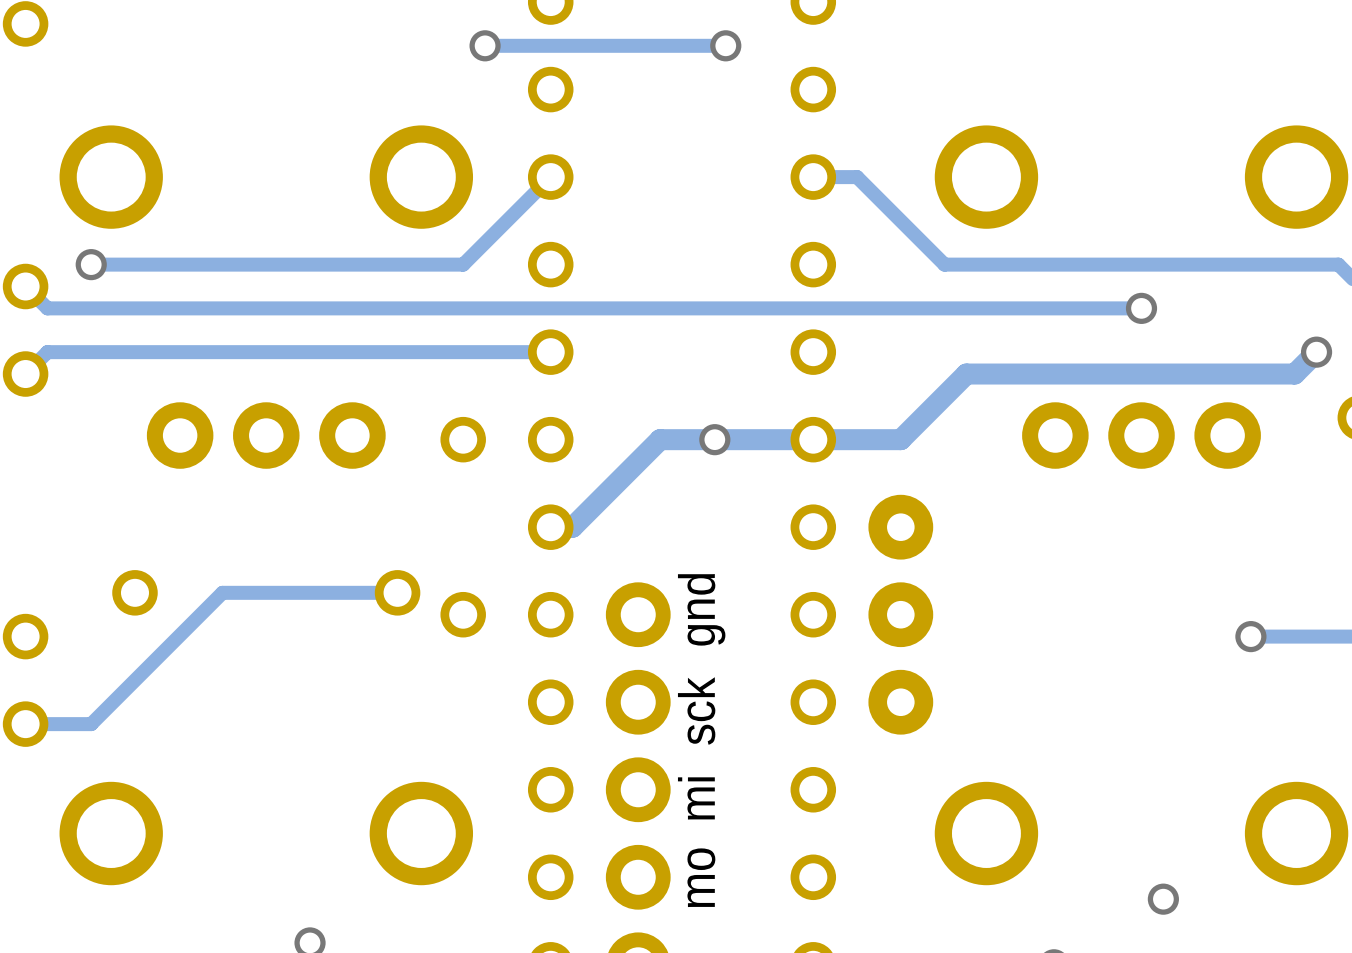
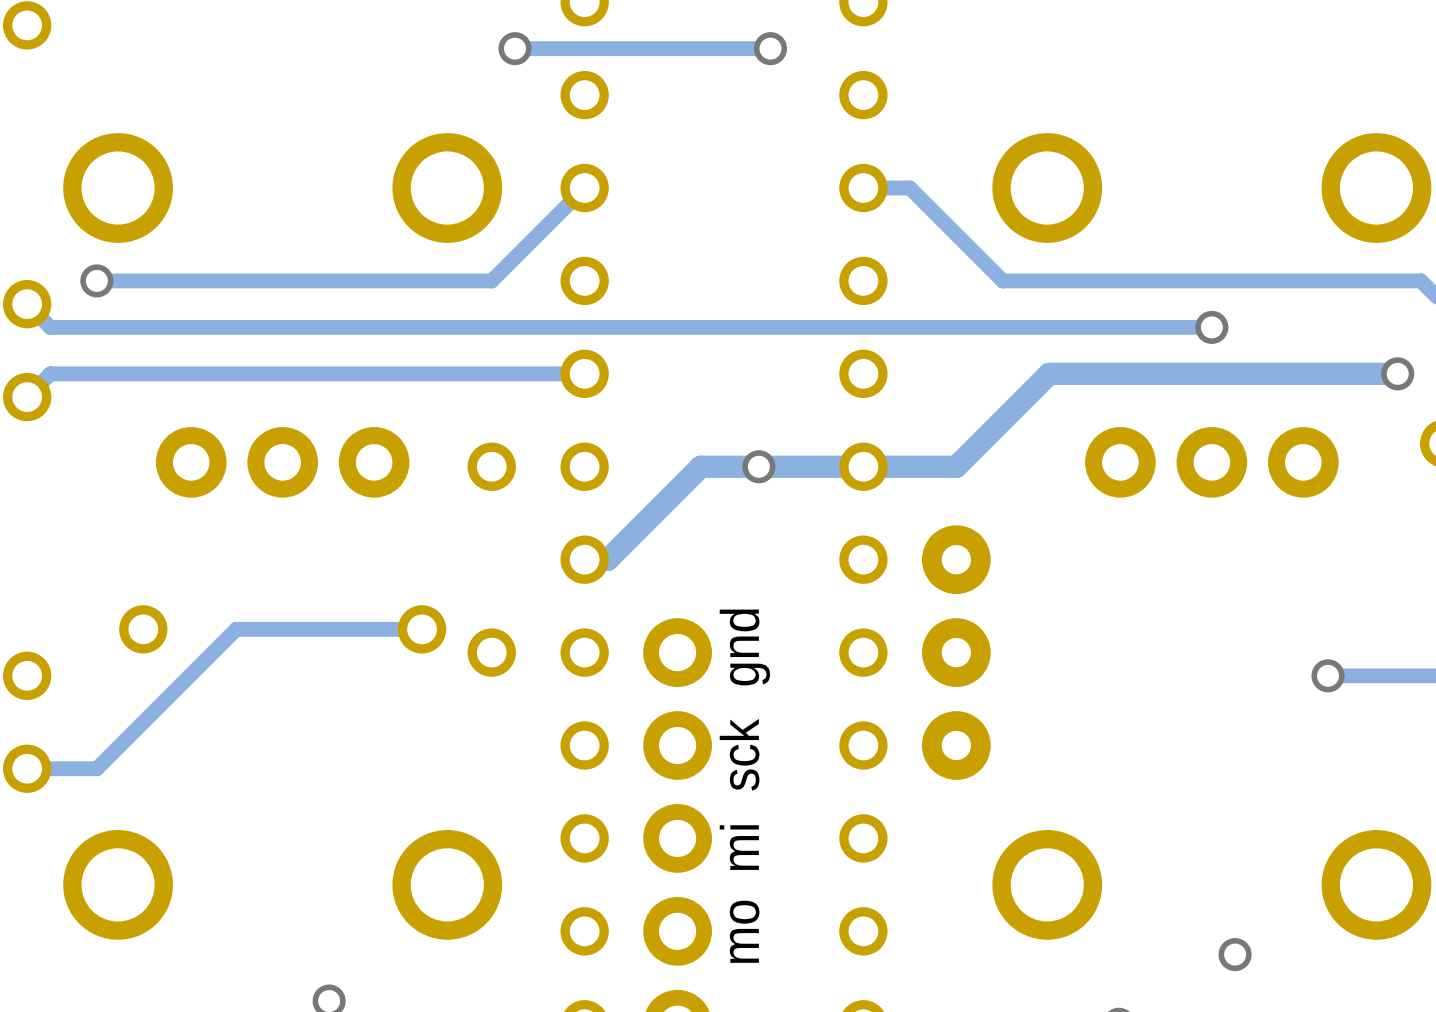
track: (1316, 352) (1294, 374) (966, 374) -> (1397, 373) (1049, 373) (1026, 397)

